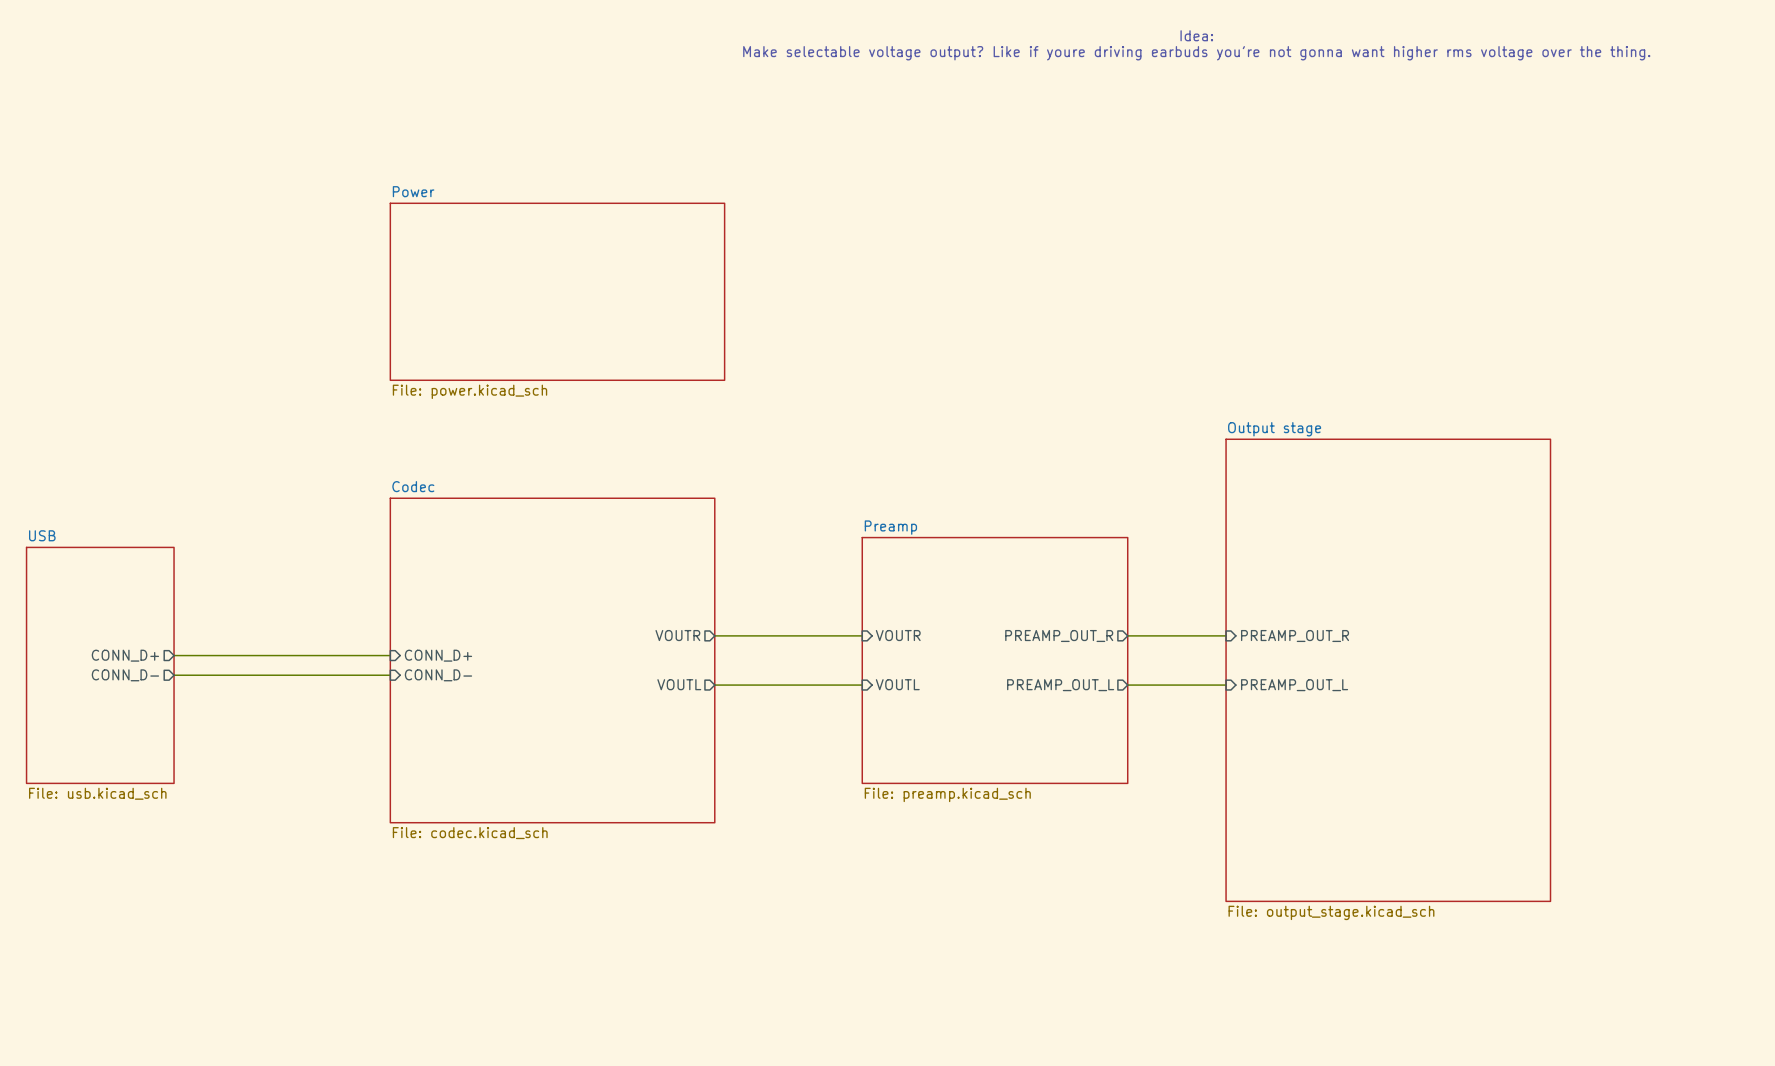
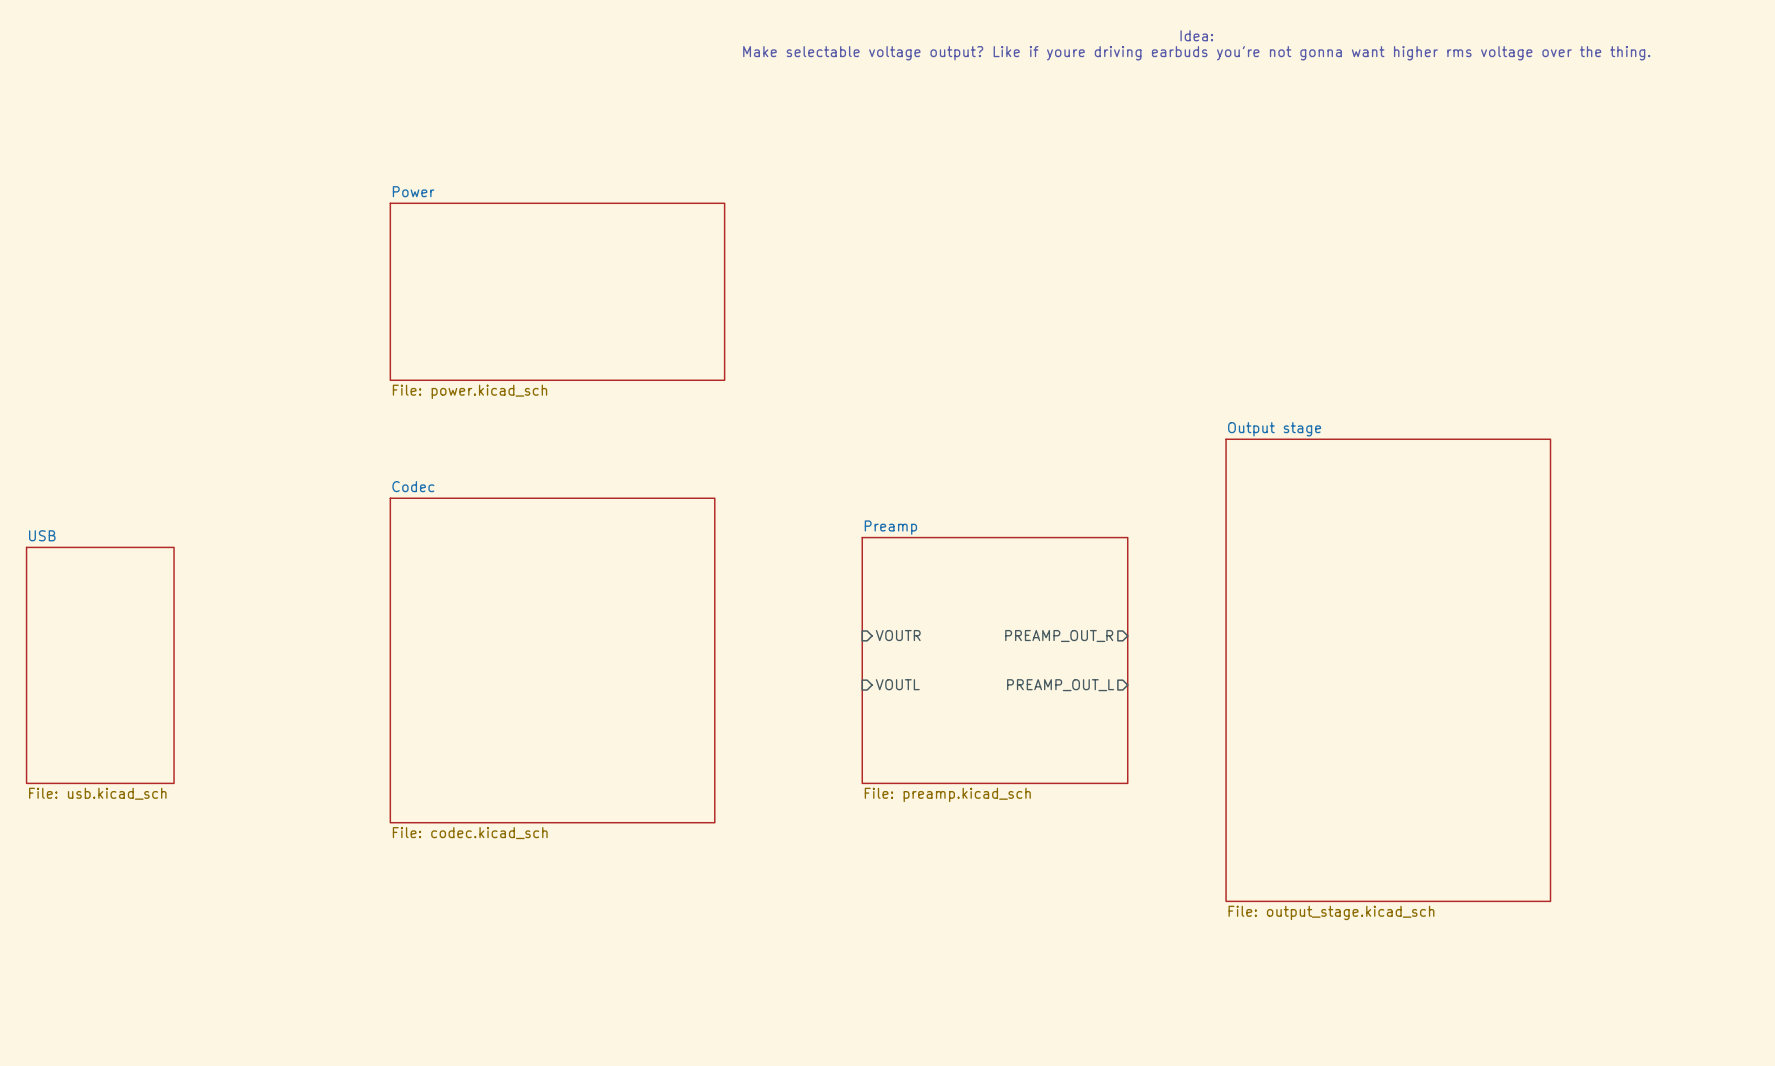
sheet pin: VOUTR (677, 635) -> none
wire: (714, 635) (862, 635) -> none
wire: (1127, 635) (1226, 635) -> none
sheet pin: PREAMP_OUT_R (1295, 636) -> none
sheet pin: CONN_D+ (125, 655) -> none
wire: (174, 655) (390, 655) -> none
sheet pin: CONN_D+ (438, 655) -> none
sheet pin: CONN_D- (125, 675) -> none
wire: (174, 675) (390, 675) -> none
sheet pin: CONN_D- (438, 675) -> none
sheet pin: VOUTL (679, 684) -> none
wire: (714, 685) (862, 685) -> none
wire: (1127, 685) (1226, 685) -> none
sheet pin: PREAMP_OUT_L (1294, 685) -> none

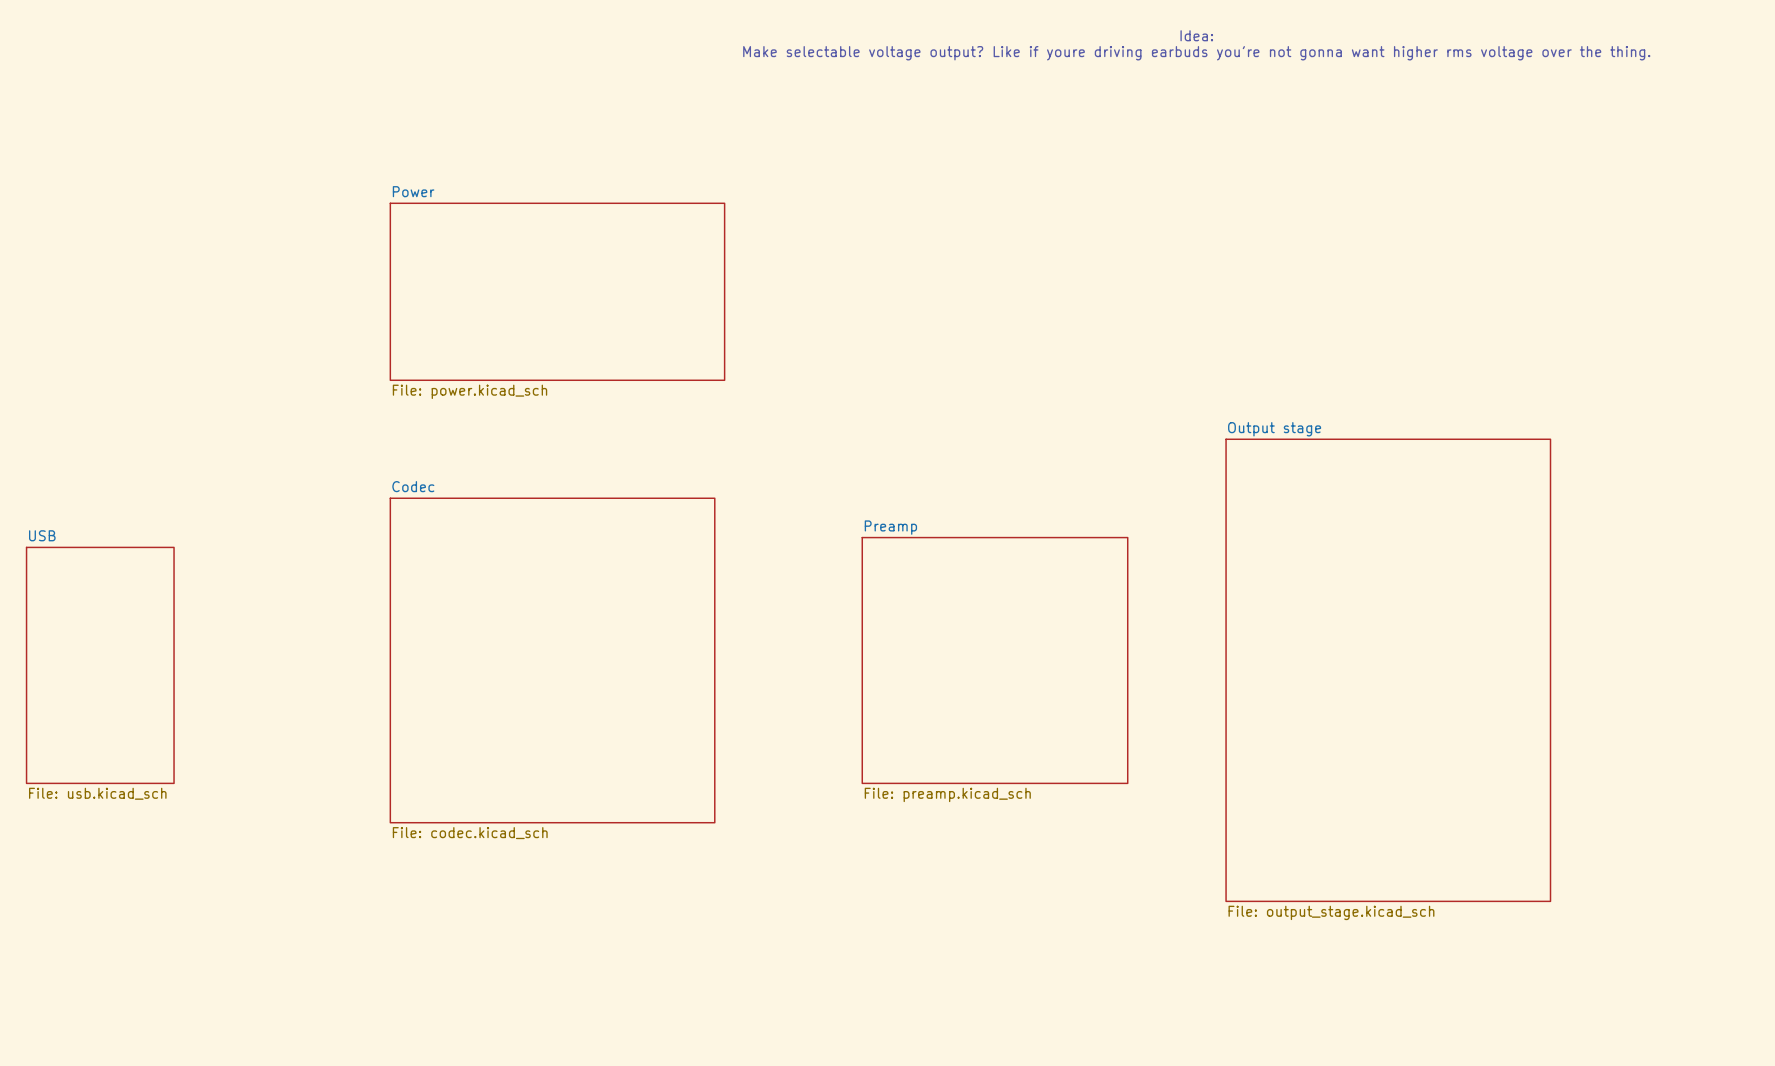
sheet pin: VOUTR (898, 635) -> none
sheet pin: PREAMP_OUT_R (1059, 636) -> none
sheet pin: VOUTL (897, 684) -> none
sheet pin: PREAMP_OUT_L (1060, 685) -> none

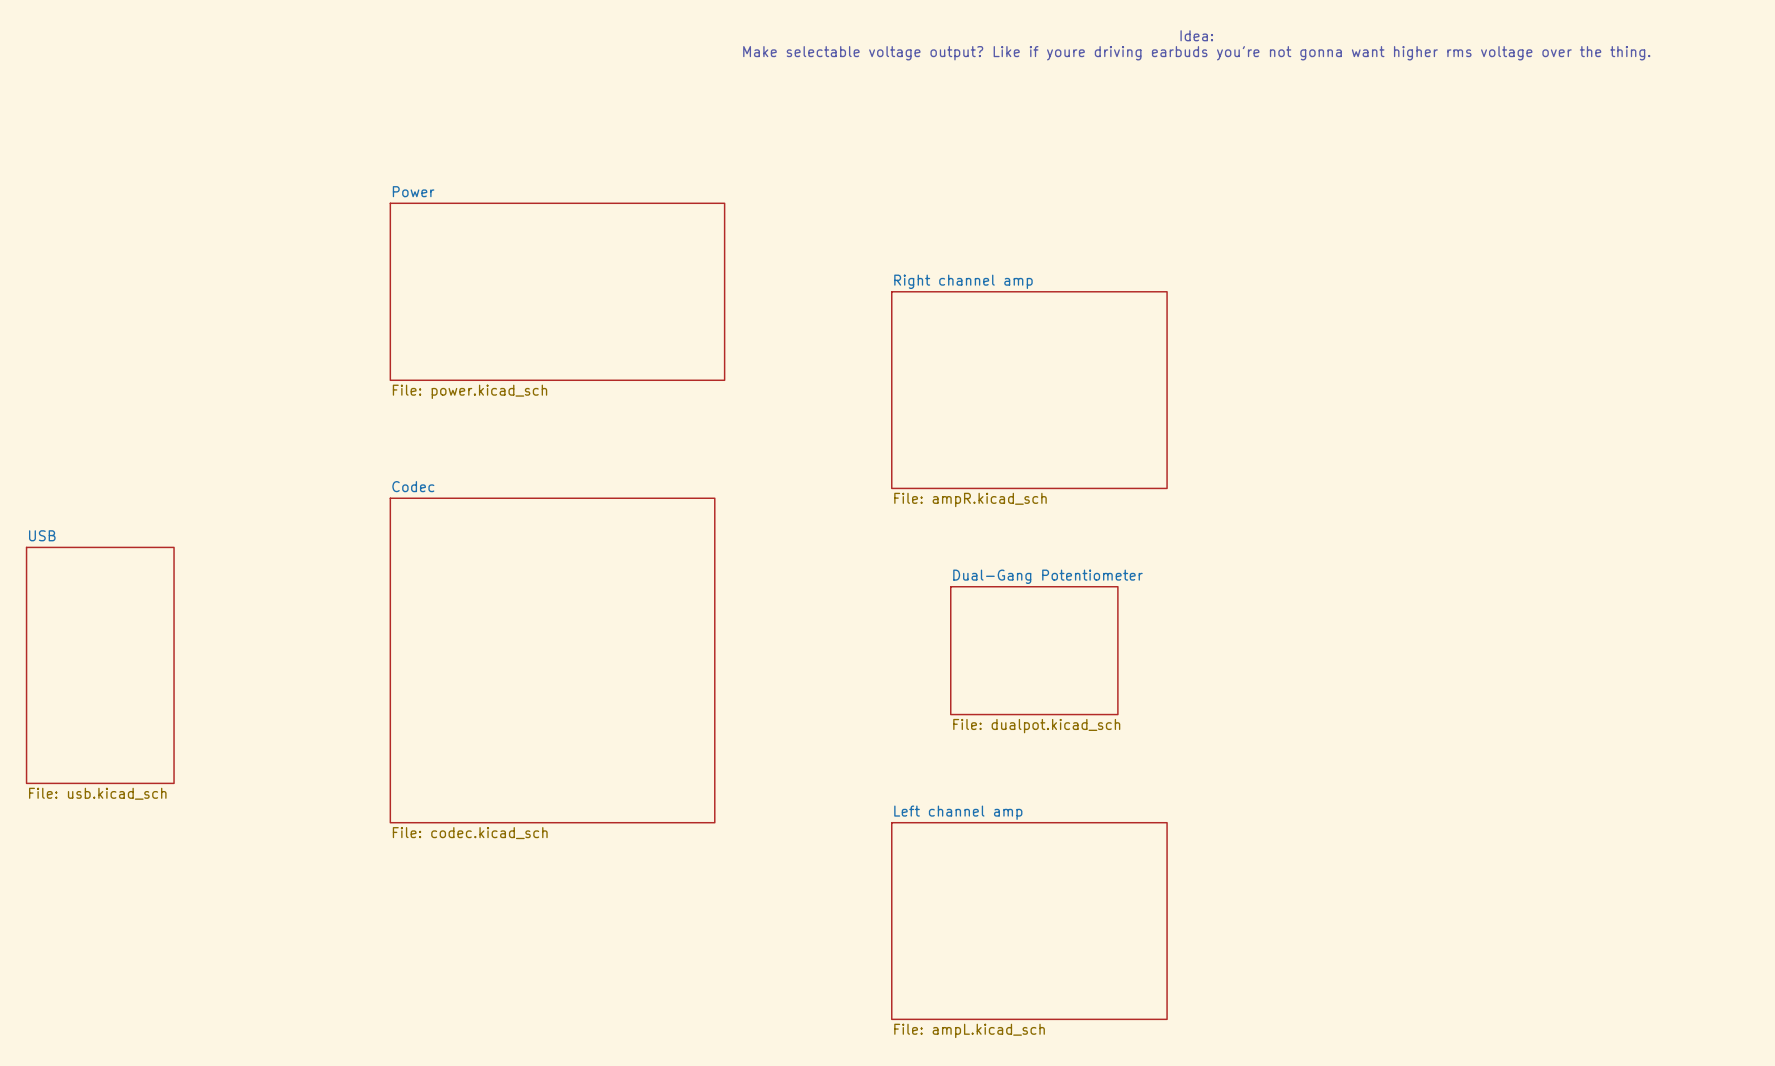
sheet Right channel amp: none -> File: ampR.kicad_sch (1029, 390)
sheet Dual-Gang Potentiometer: none -> File: dualpot.kicad_sch (1034, 650)
sheet Preamp: File: preamp.kicad_sch (994, 660) -> none
sheet Output stage: File: output_stage.kicad_sch (1388, 670) -> none
sheet Left channel amp: none -> File: ampL.kicad_sch (1029, 921)

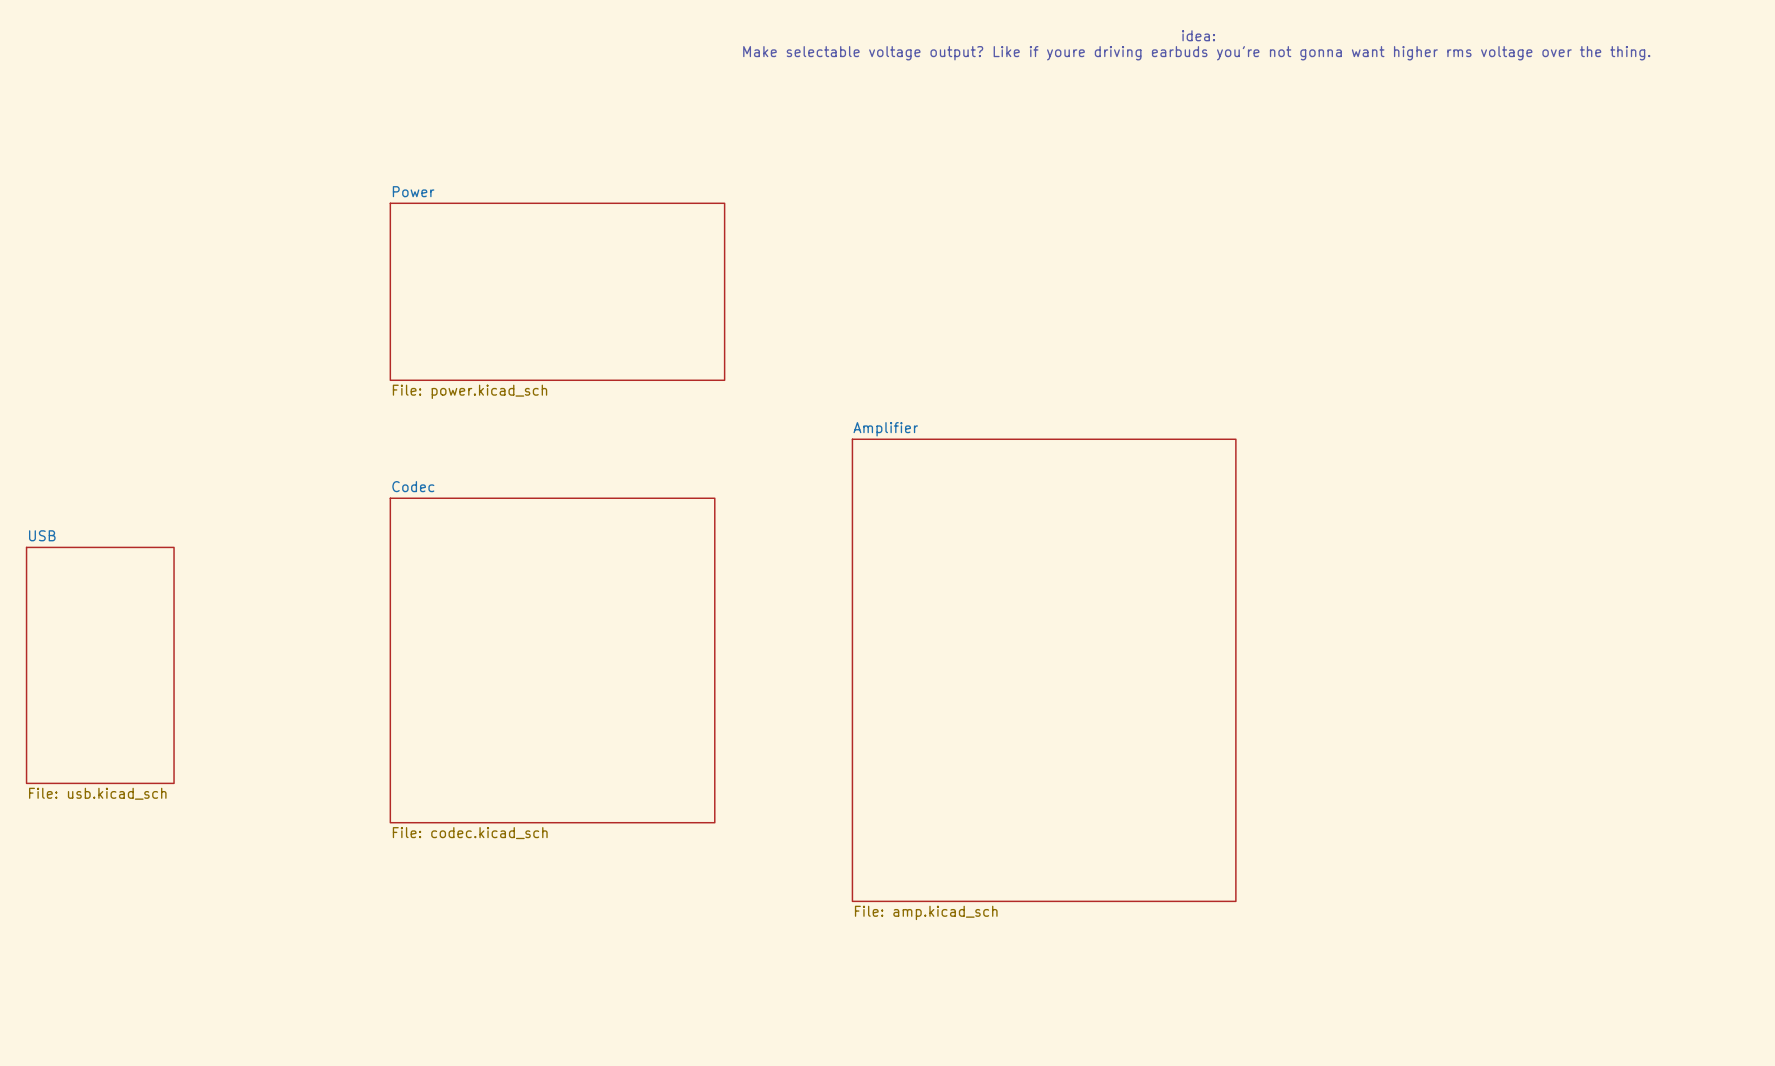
text: Idea: (1196, 35) -> idea: (1198, 35)
sheet Right channel amp: File: ampR.kicad_sch (1029, 390) -> none
sheet Dual-Gang Potentiometer: File: dualpot.kicad_sch (1034, 650) -> none
sheet Amplifier: none -> File: amp.kicad_sch (1044, 670)
sheet Left channel amp: File: ampL.kicad_sch (1029, 921) -> none

